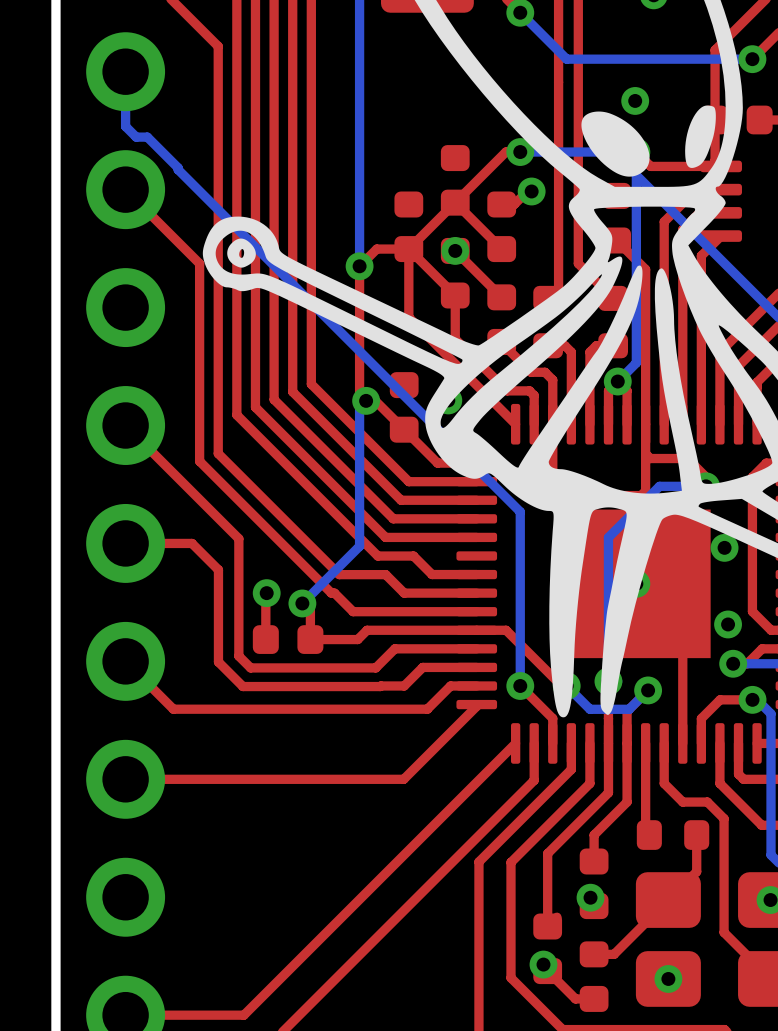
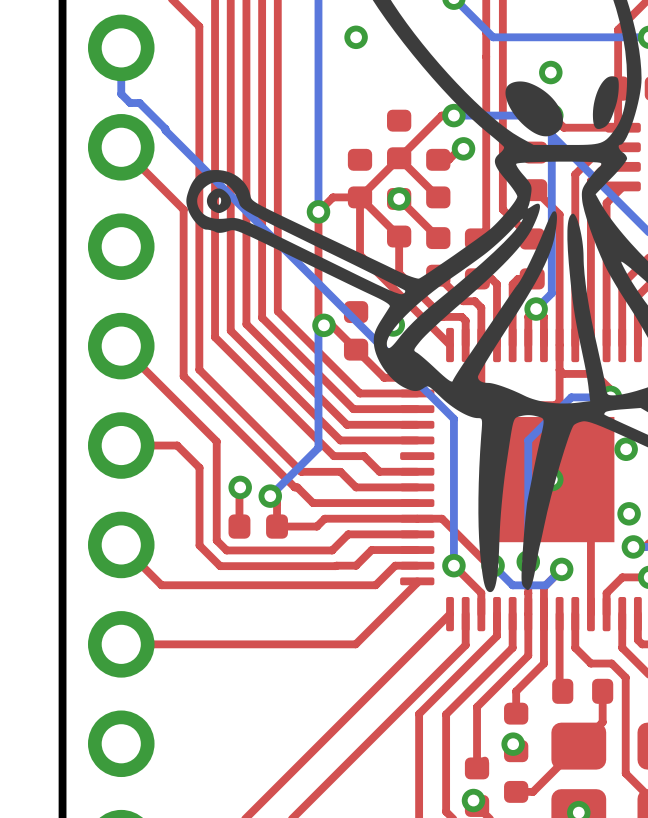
via: none -> (356, 37)

